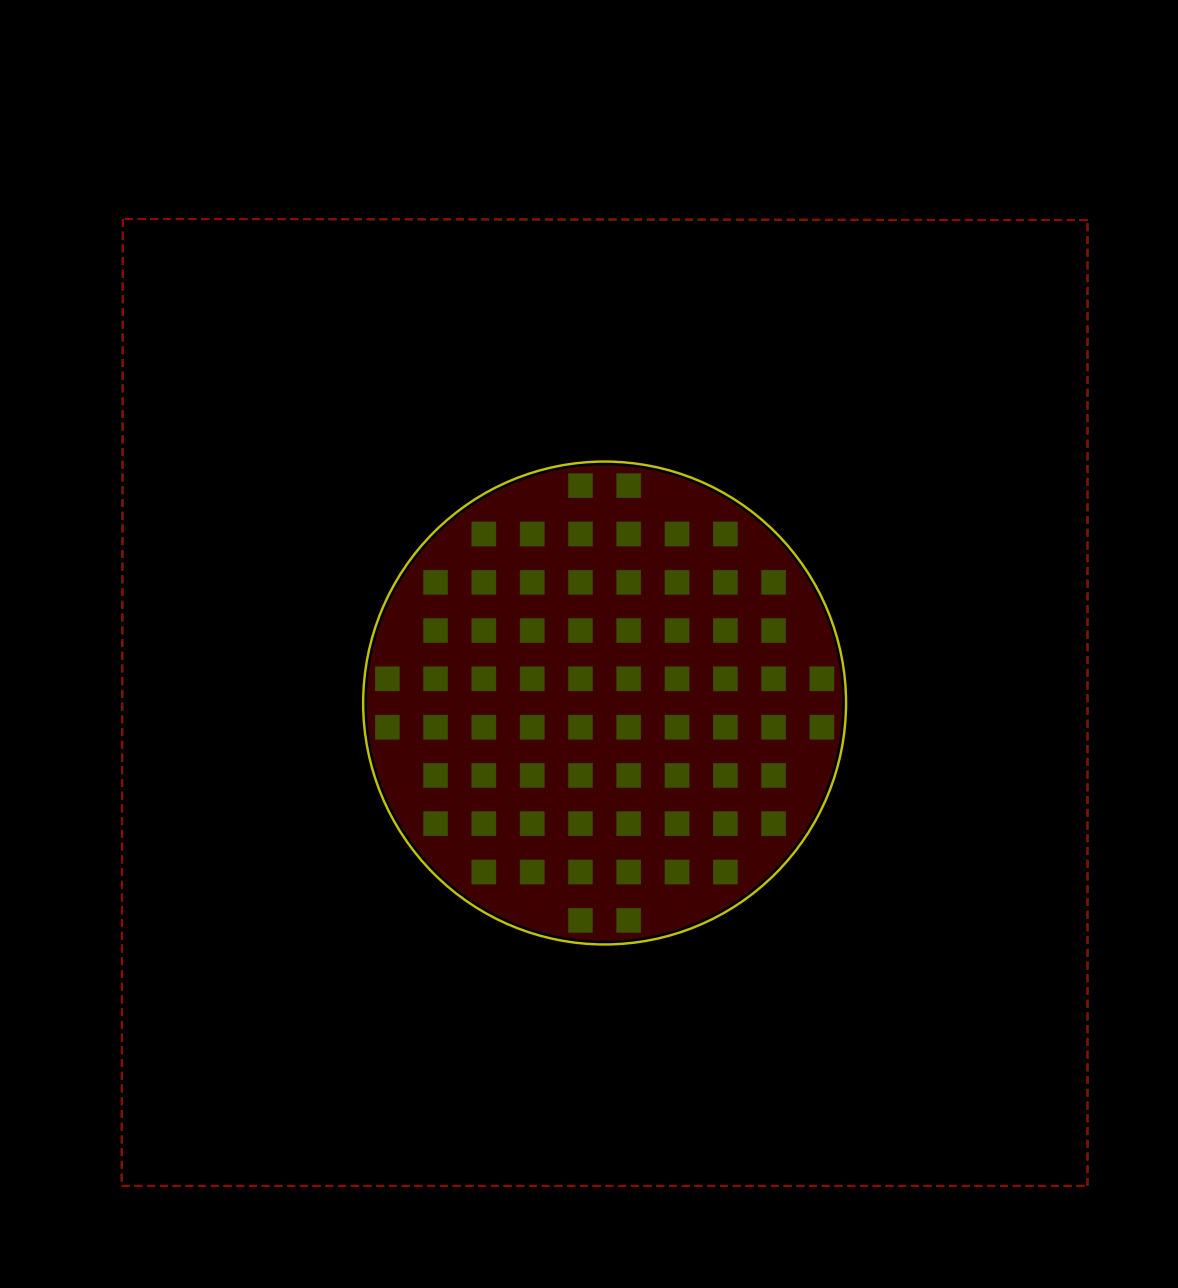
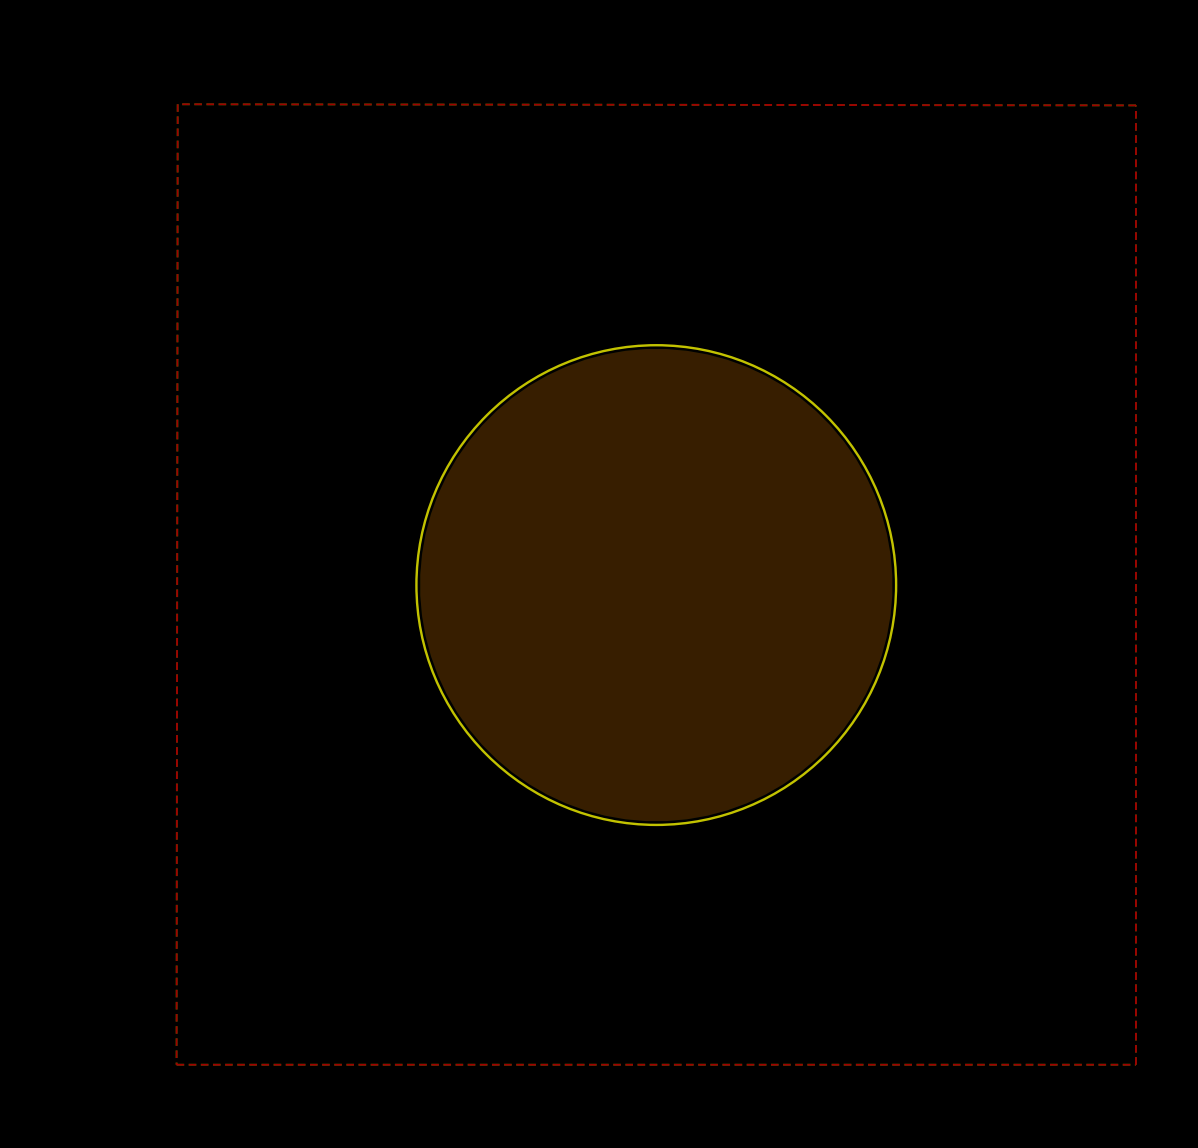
drawing: [374, 473, 835, 933] -> none

